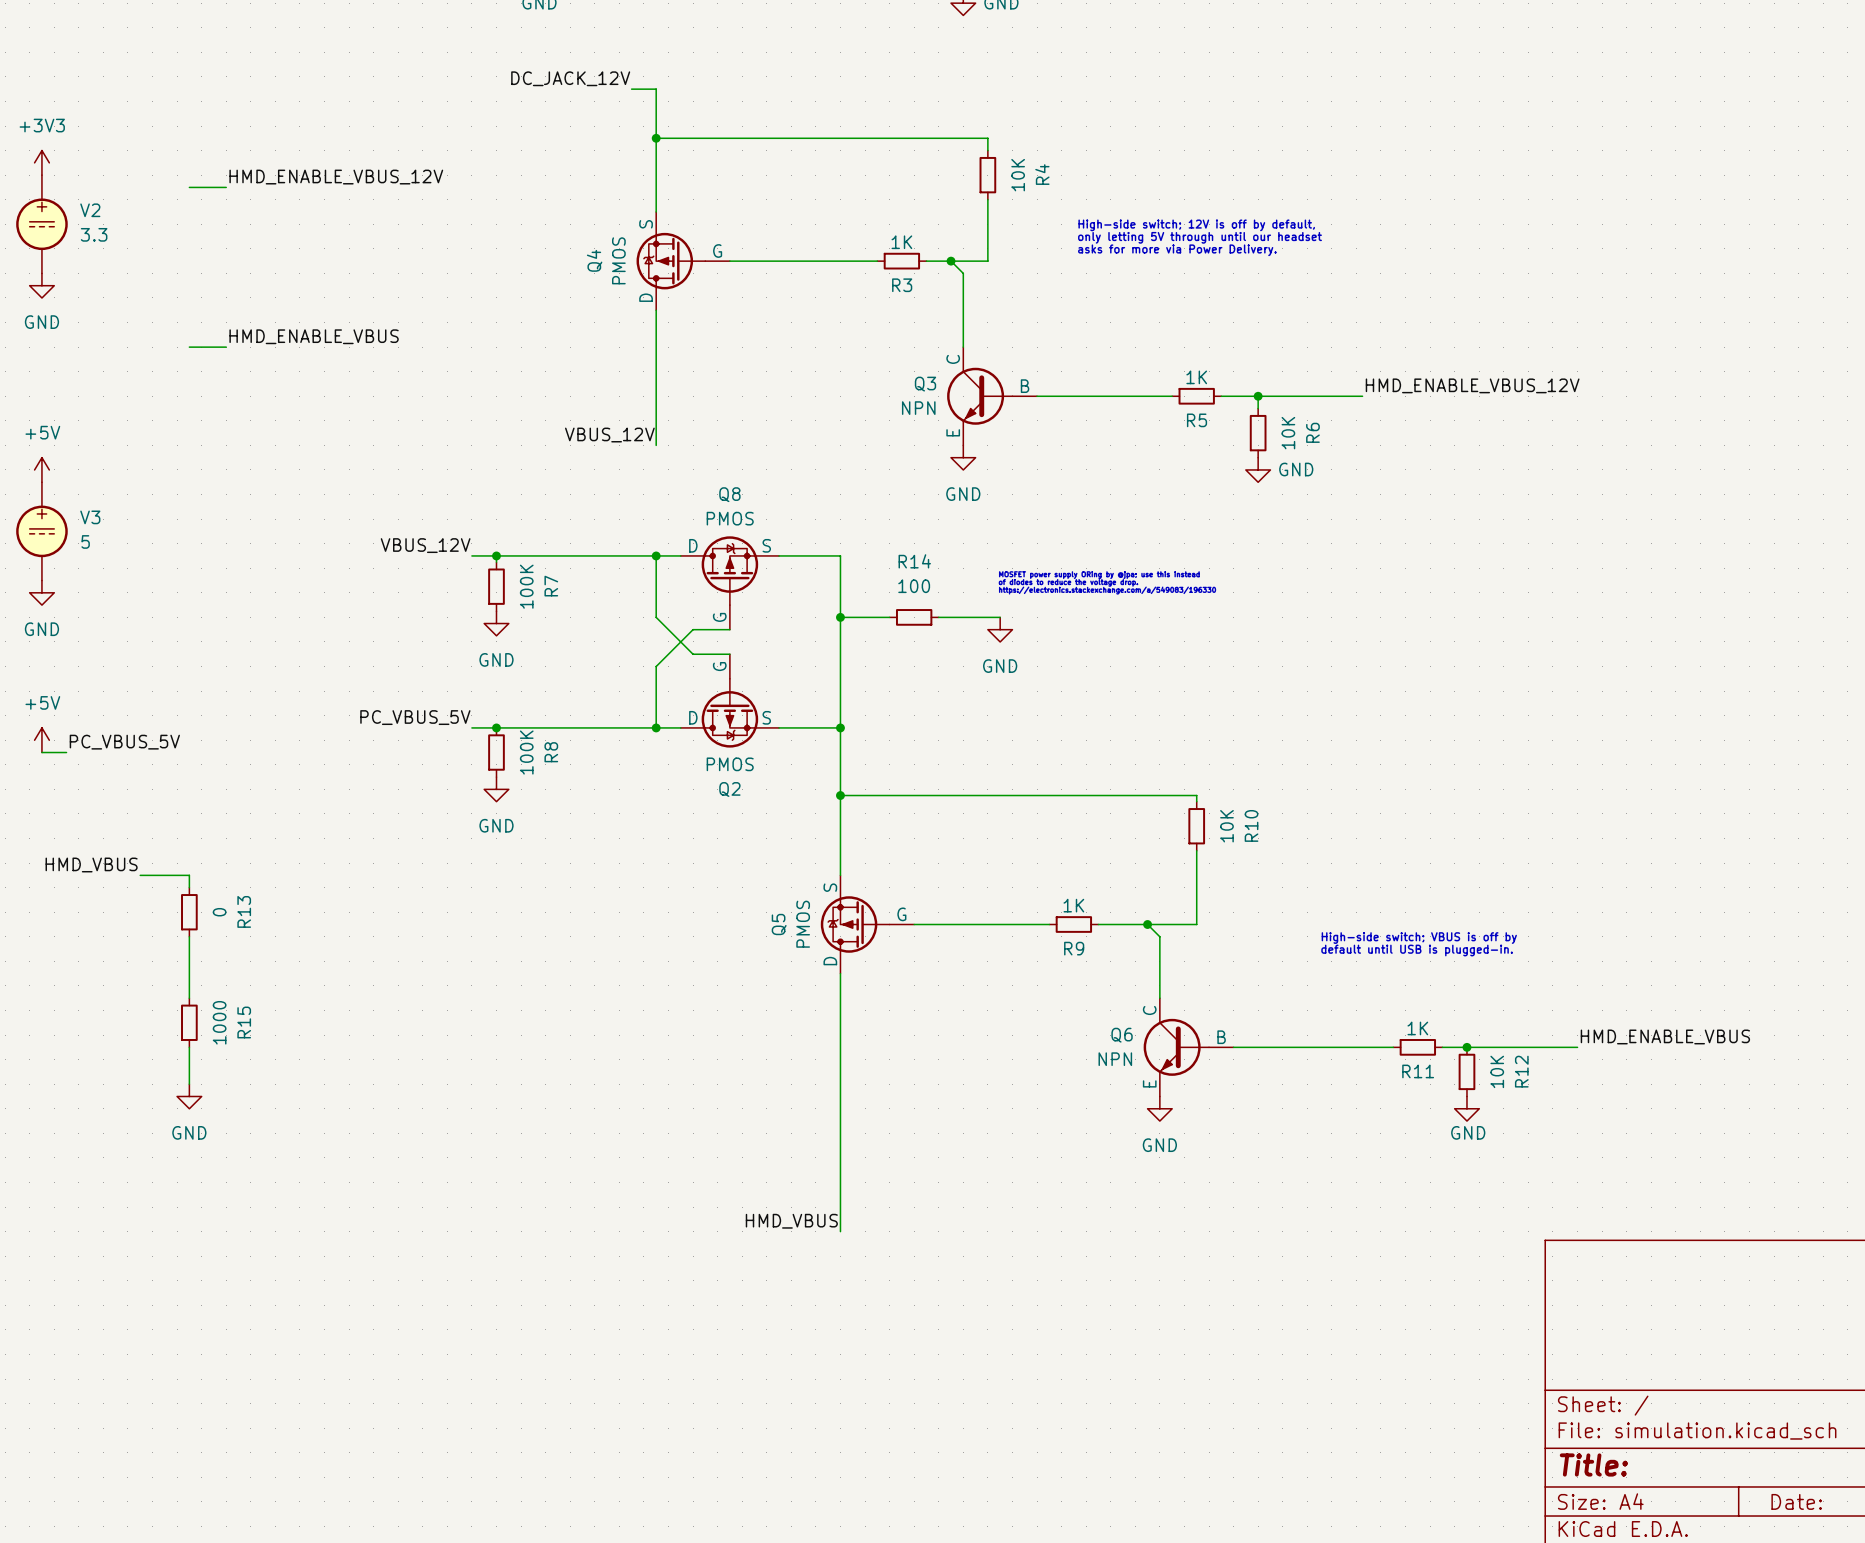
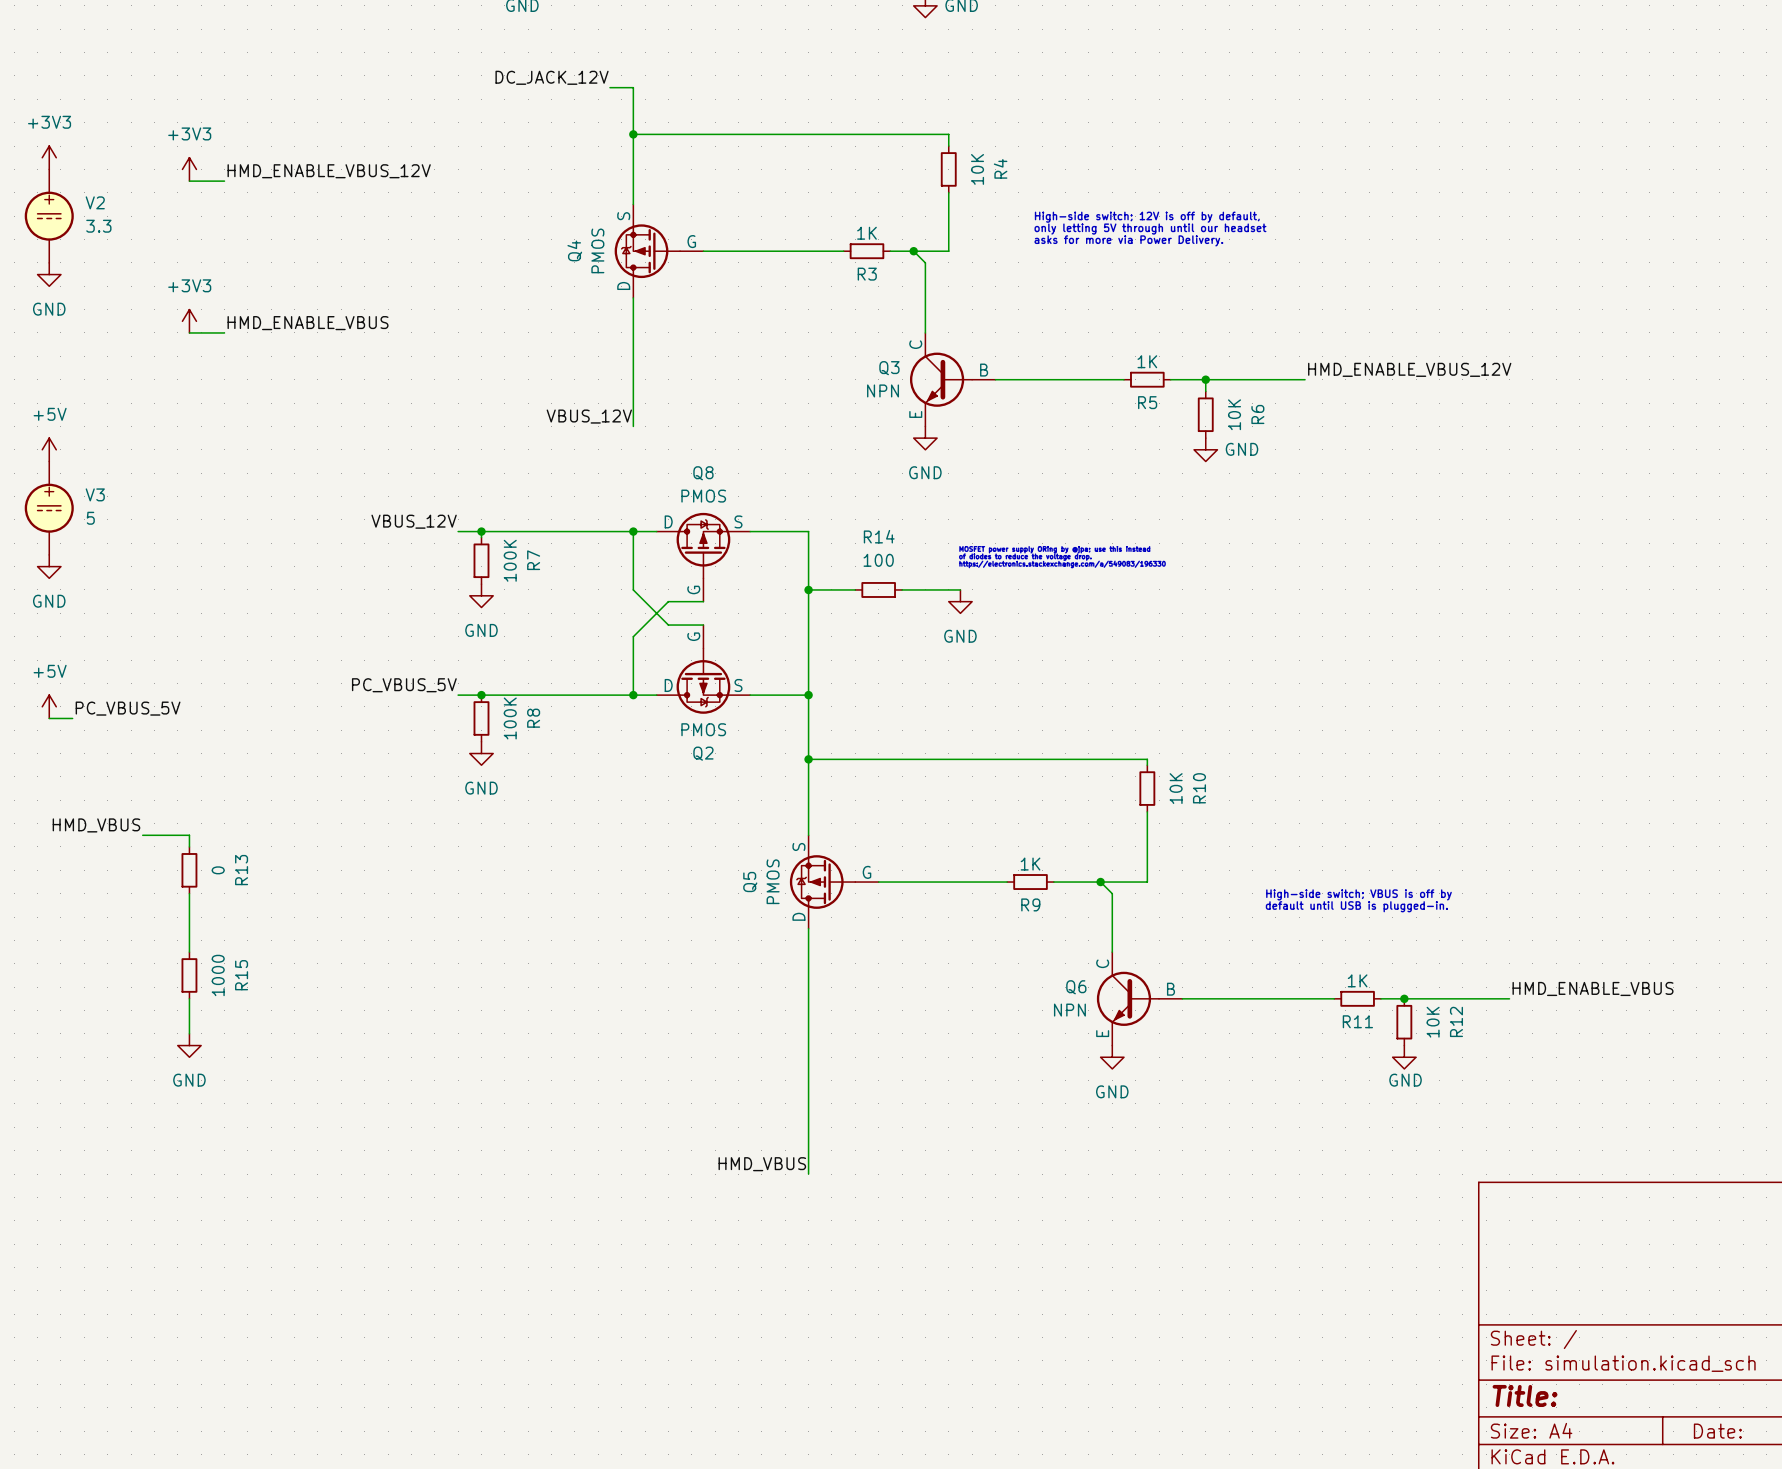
power symbol: none -> +3V3 (189, 169)
power symbol: none -> +3V3 (189, 321)

